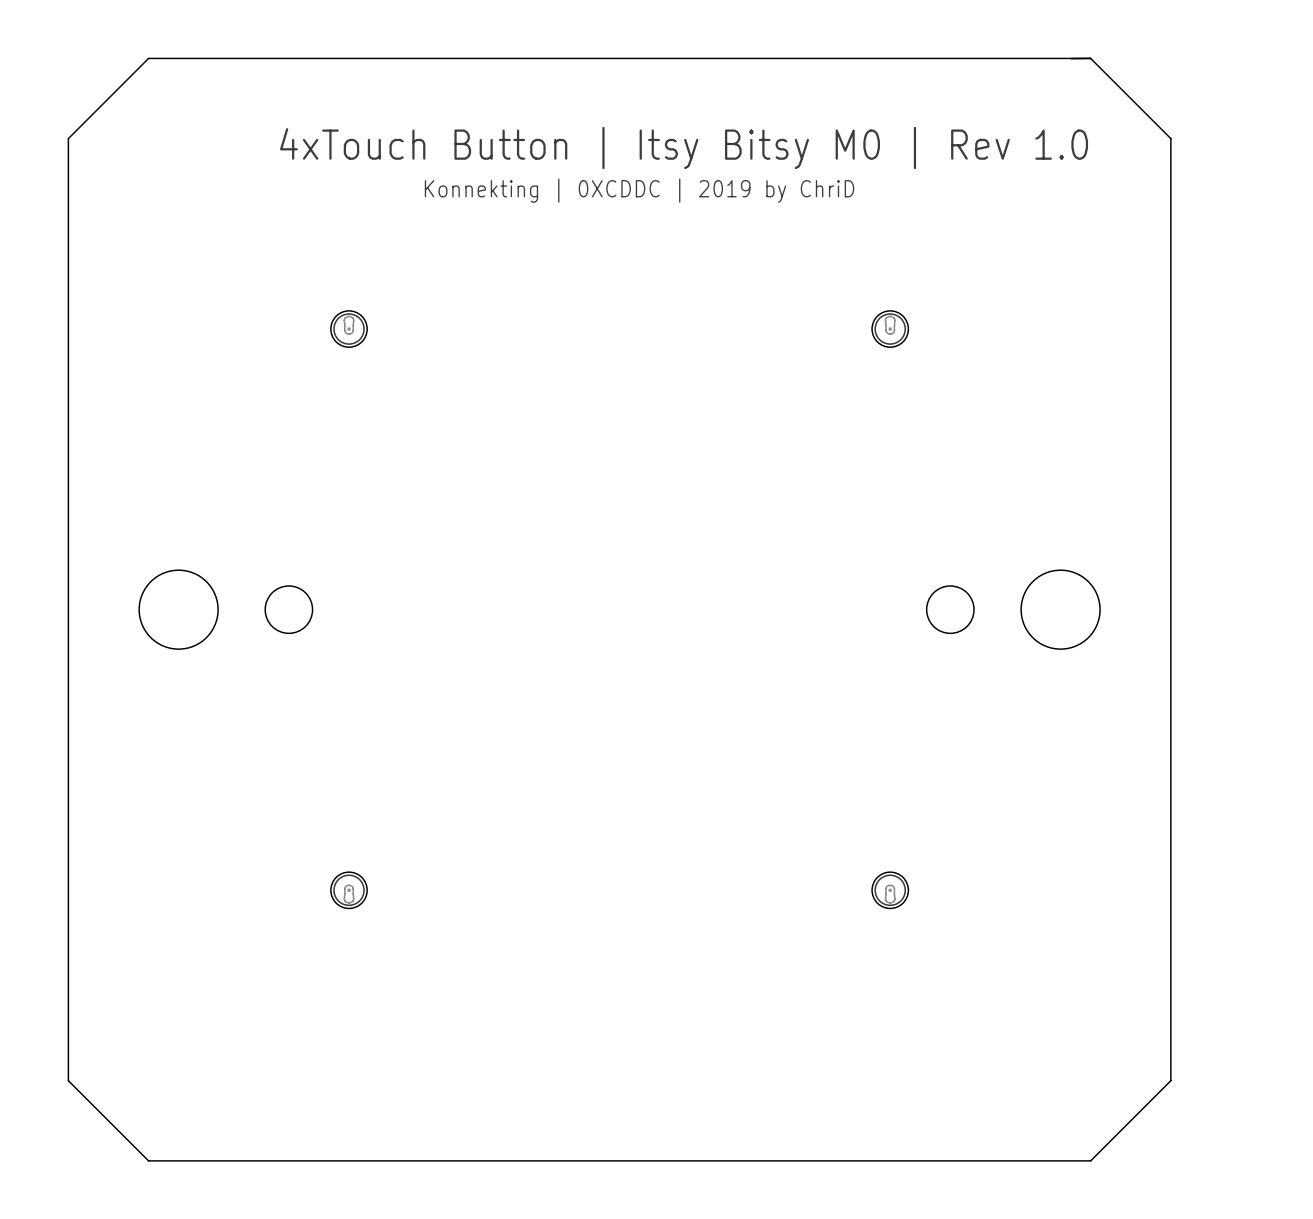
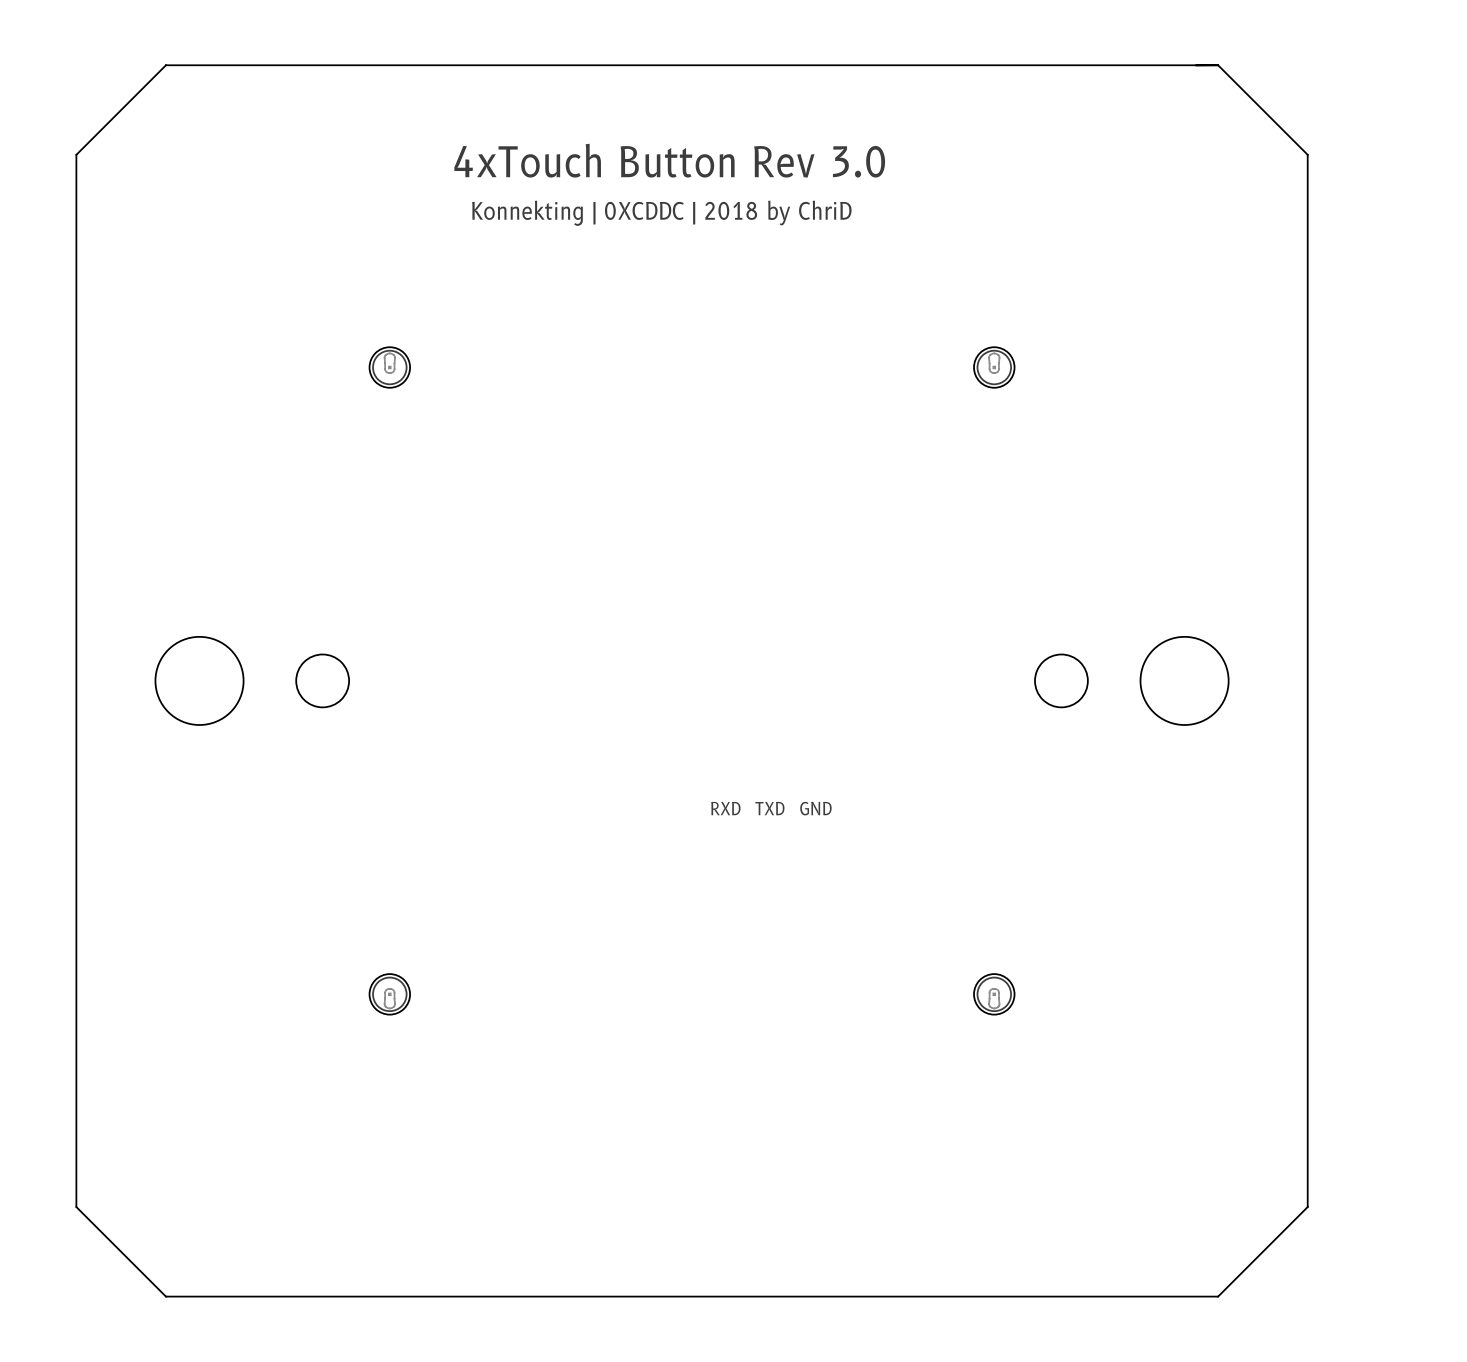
text: 4xTouch Button | Itsy Bitsy M0 | Rev 1.0 (684, 147) -> 4xTouch Button Rev 3.0 (669, 160)
text: Konnekting | 0XCDDC | 2019 by ChriD (639, 190) -> Konnekting | 0XCDDC | 2018 by ChriD (661, 213)
text: none -> RXD (725, 808)
text: none -> TXD (769, 808)
text: none -> GND (815, 808)

